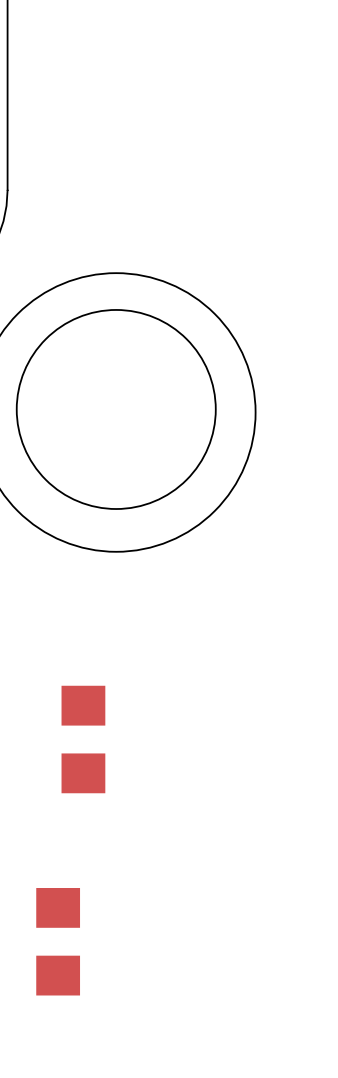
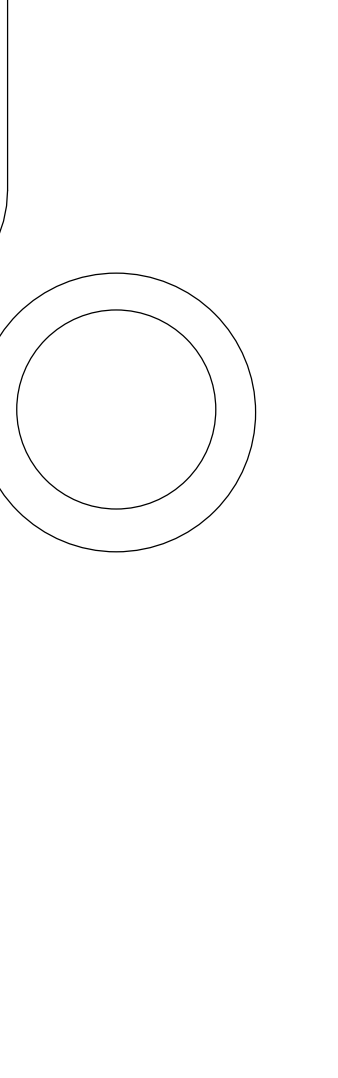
part: (83, 739) -> none
part: (58, 941) -> none

